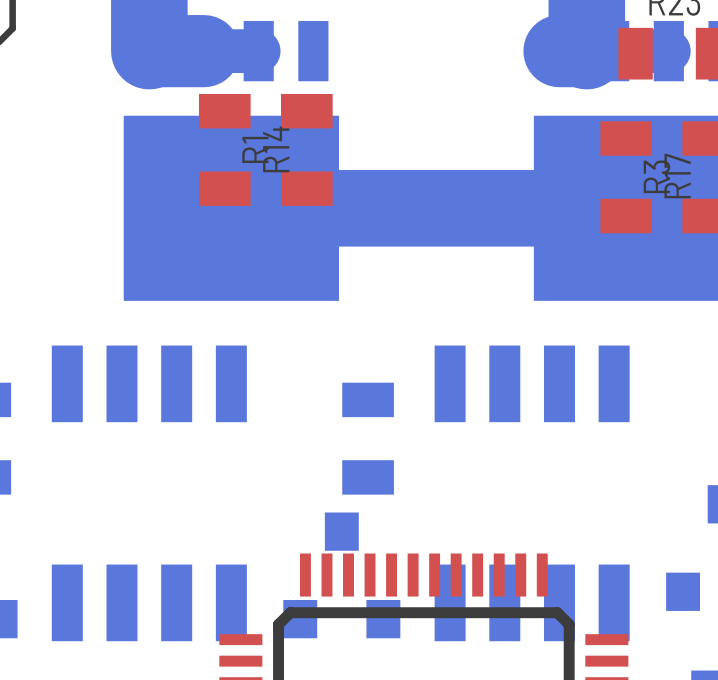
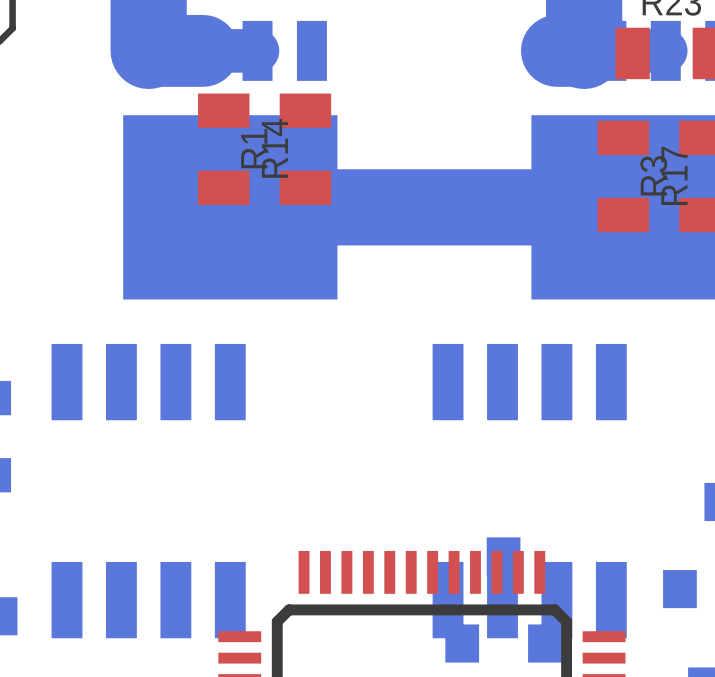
part: (368, 438) -> none
part position: (341, 575) -> (503, 599)

